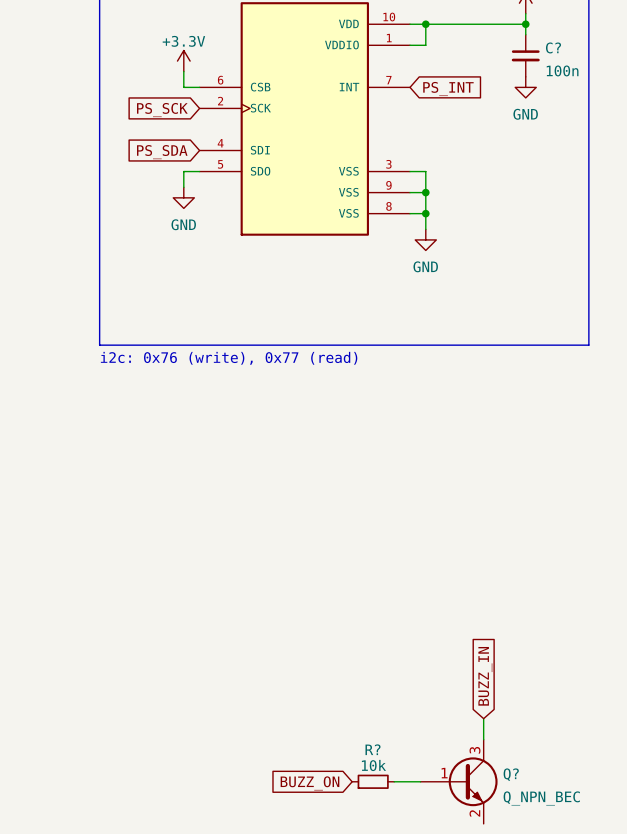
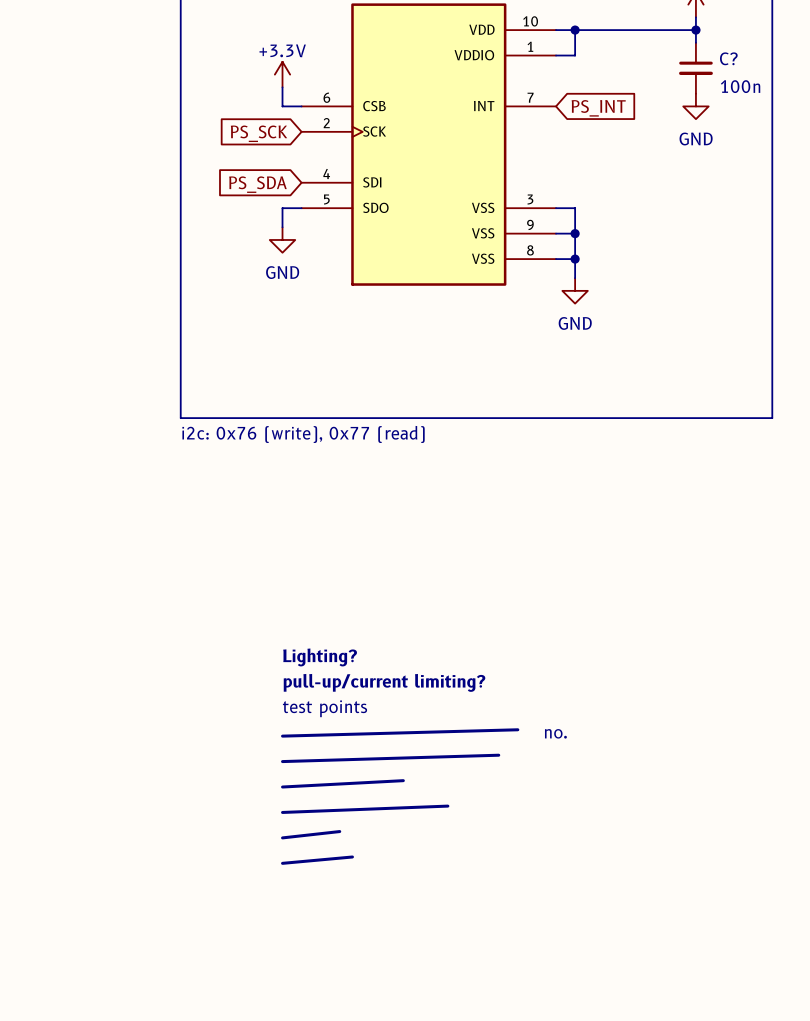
text: none -> Lighting? (320, 657)
text: none -> pull-up/current limiting? (384, 682)
text: none -> test points (325, 708)
line: none -> (517, 729) (282, 736)
text: none -> no. (555, 733)
line: none -> (498, 755) (282, 761)
line: none -> (403, 780) (282, 787)
line: none -> (447, 806) (282, 812)
global label: BUZZ_IN (485, 676) -> none
line: none -> (339, 831) (282, 837)
line: none -> (352, 856) (282, 863)
wire: (483, 718) (483, 739) -> none
R?: 10k (373, 781) -> none
wire: (394, 781) (420, 781) -> none
Q?: Q_NPN_BEC (459, 781) -> none
global label: BUZZ_ON (310, 783) -> none

